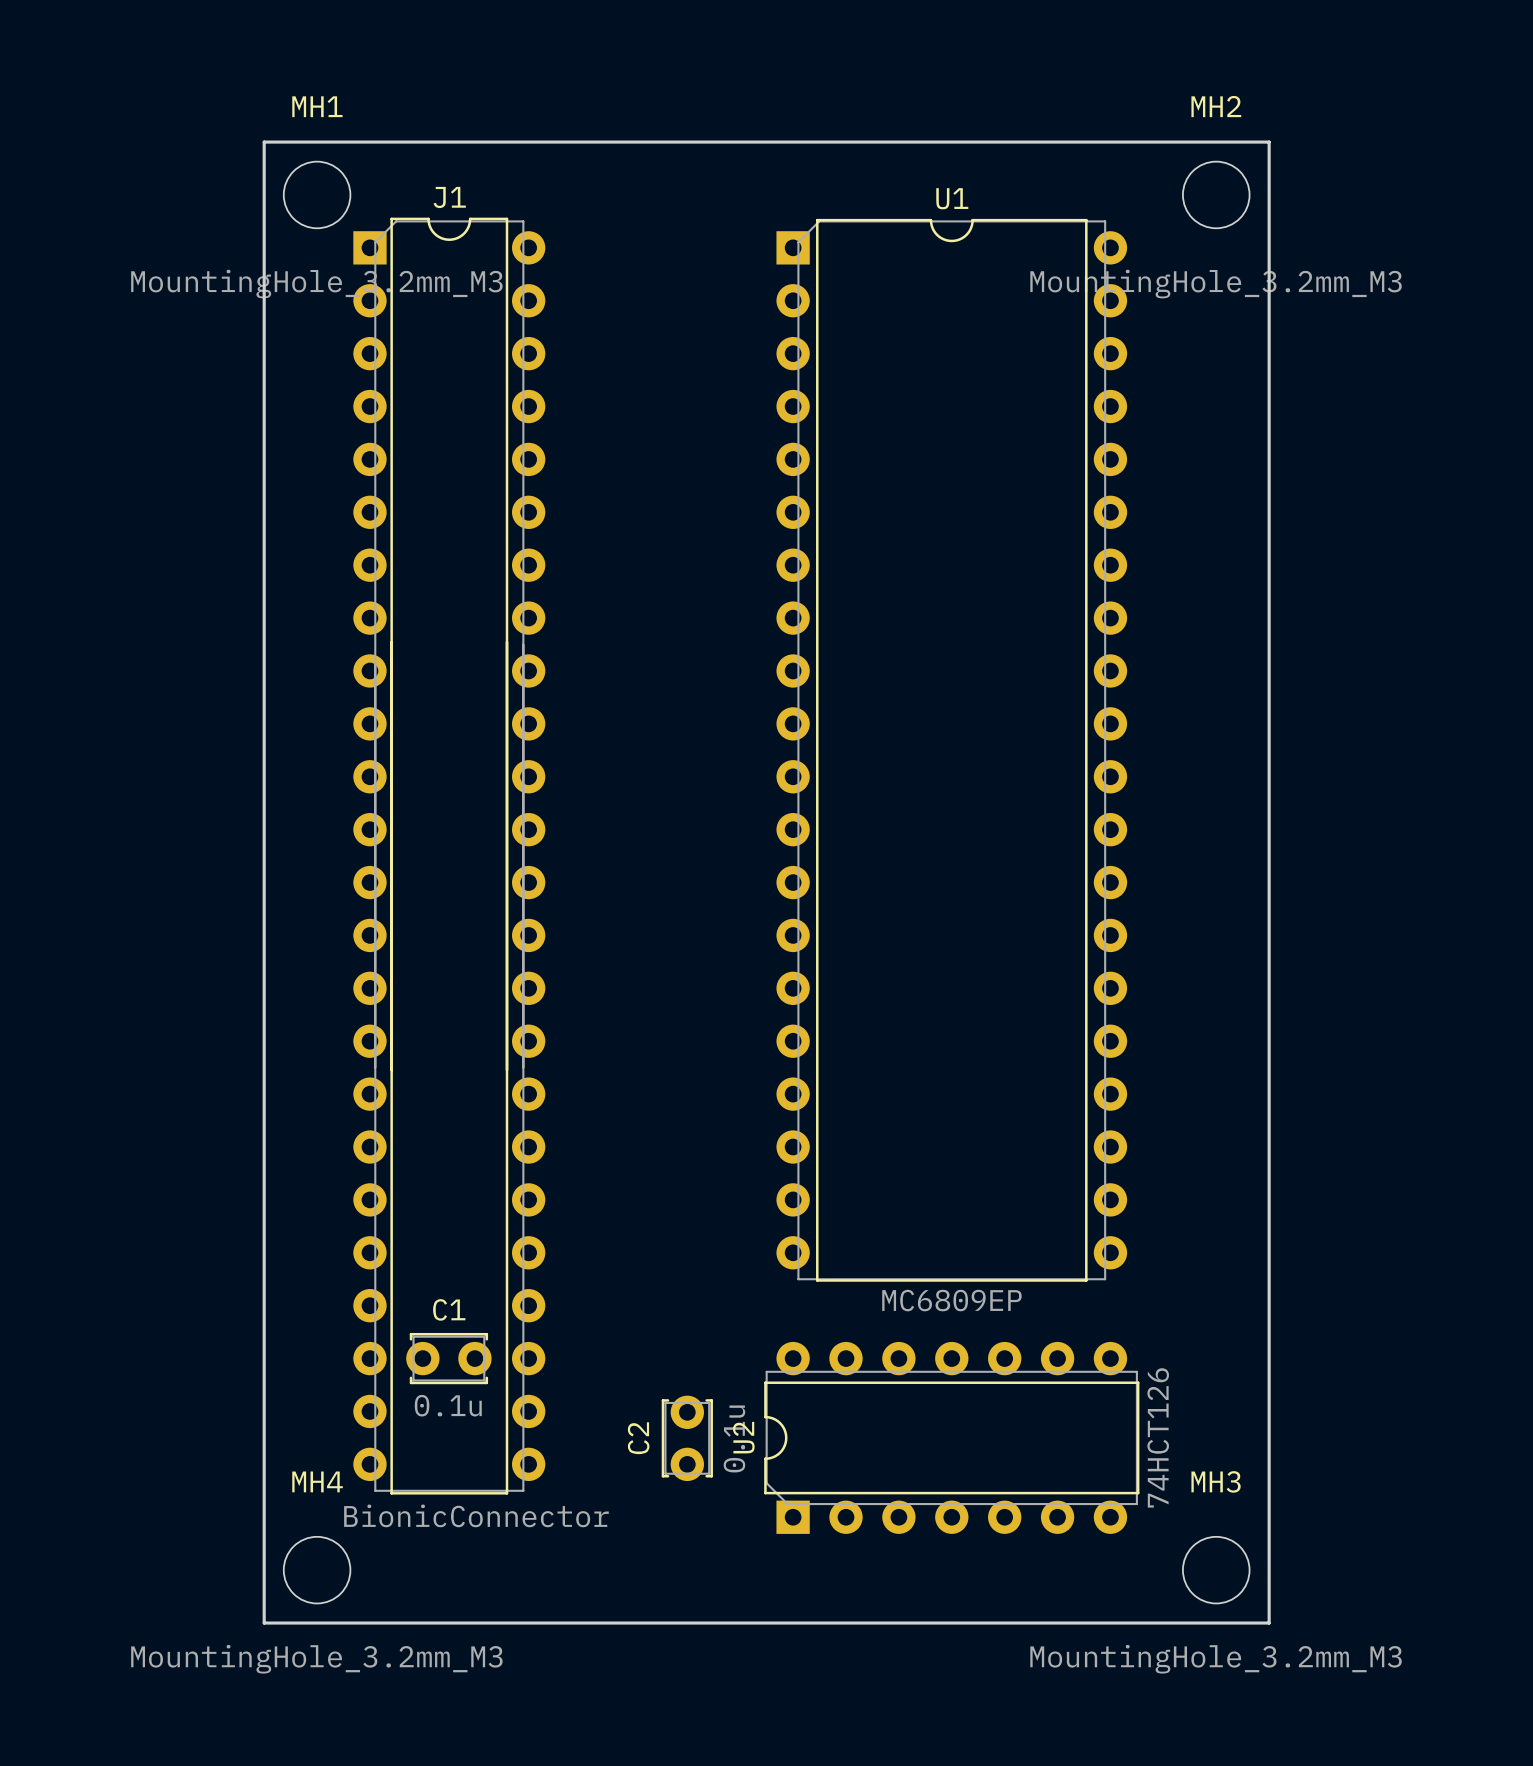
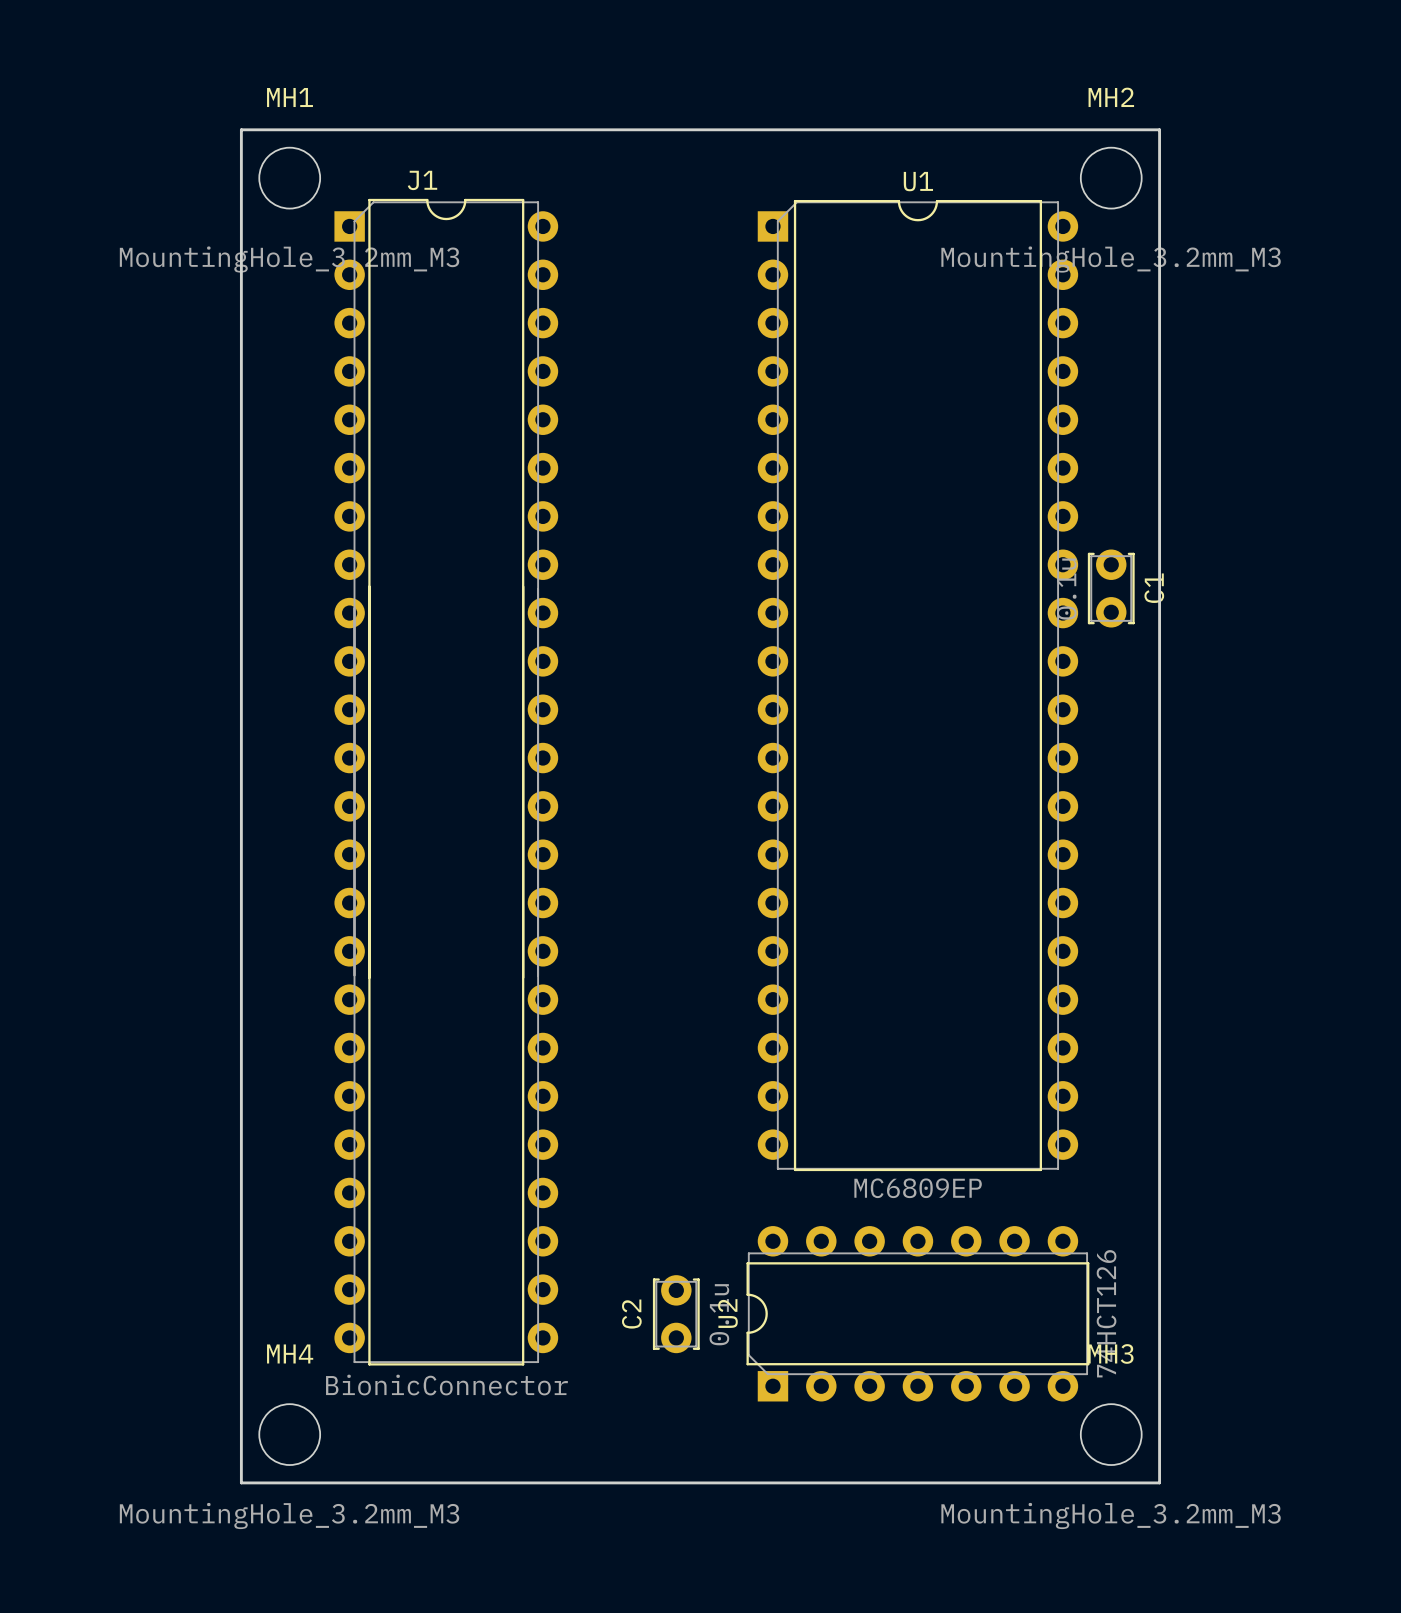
J1 footprint: [353, 217, 546, 1495] -> [334, 198, 559, 1366]
U1 position: (951, 750) -> (917, 685)
C1 rotation: 0° (448, 1358) -> 90° clockwise (1111, 588)
C1 position: (448, 1358) -> (1111, 588)
U2 position: (951, 1437) -> (917, 1313)
C2 position: (687, 1438) -> (676, 1314)

